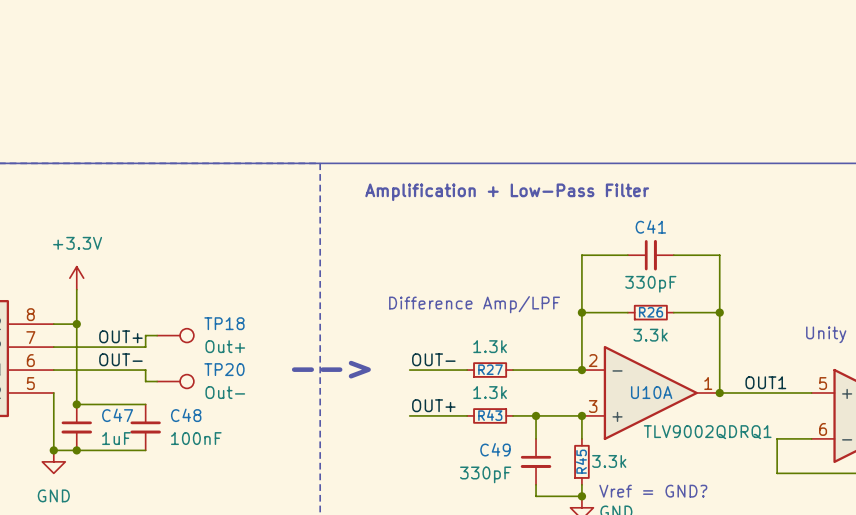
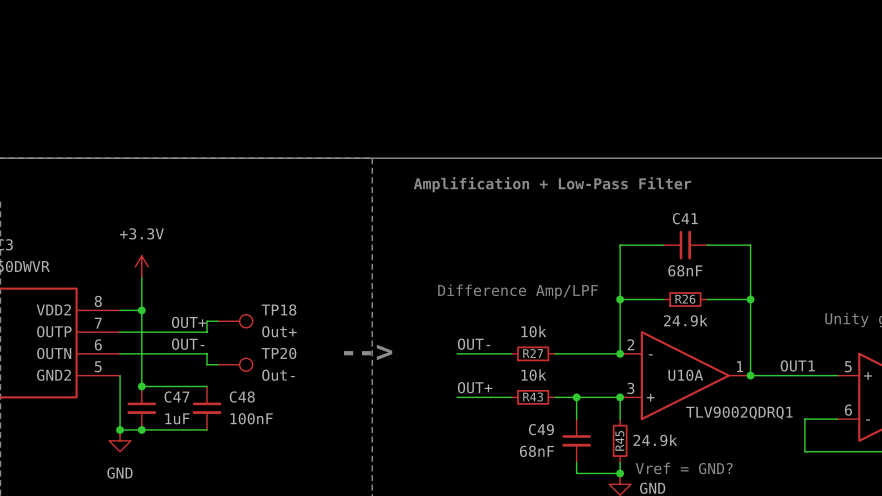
C41 value: 330pF (650, 284) -> 68nF (685, 270)
R26 value: 3.3k (650, 335) -> 24.9k (685, 320)
R27 value: 1.3k (490, 346) -> 10k (533, 331)
R43 value: 1.3k (490, 392) -> 10k (533, 375)
R45 value: 3.3k (609, 461) -> 24.9k (655, 440)
C49 value: 330pF (485, 474) -> 68nF (536, 451)

